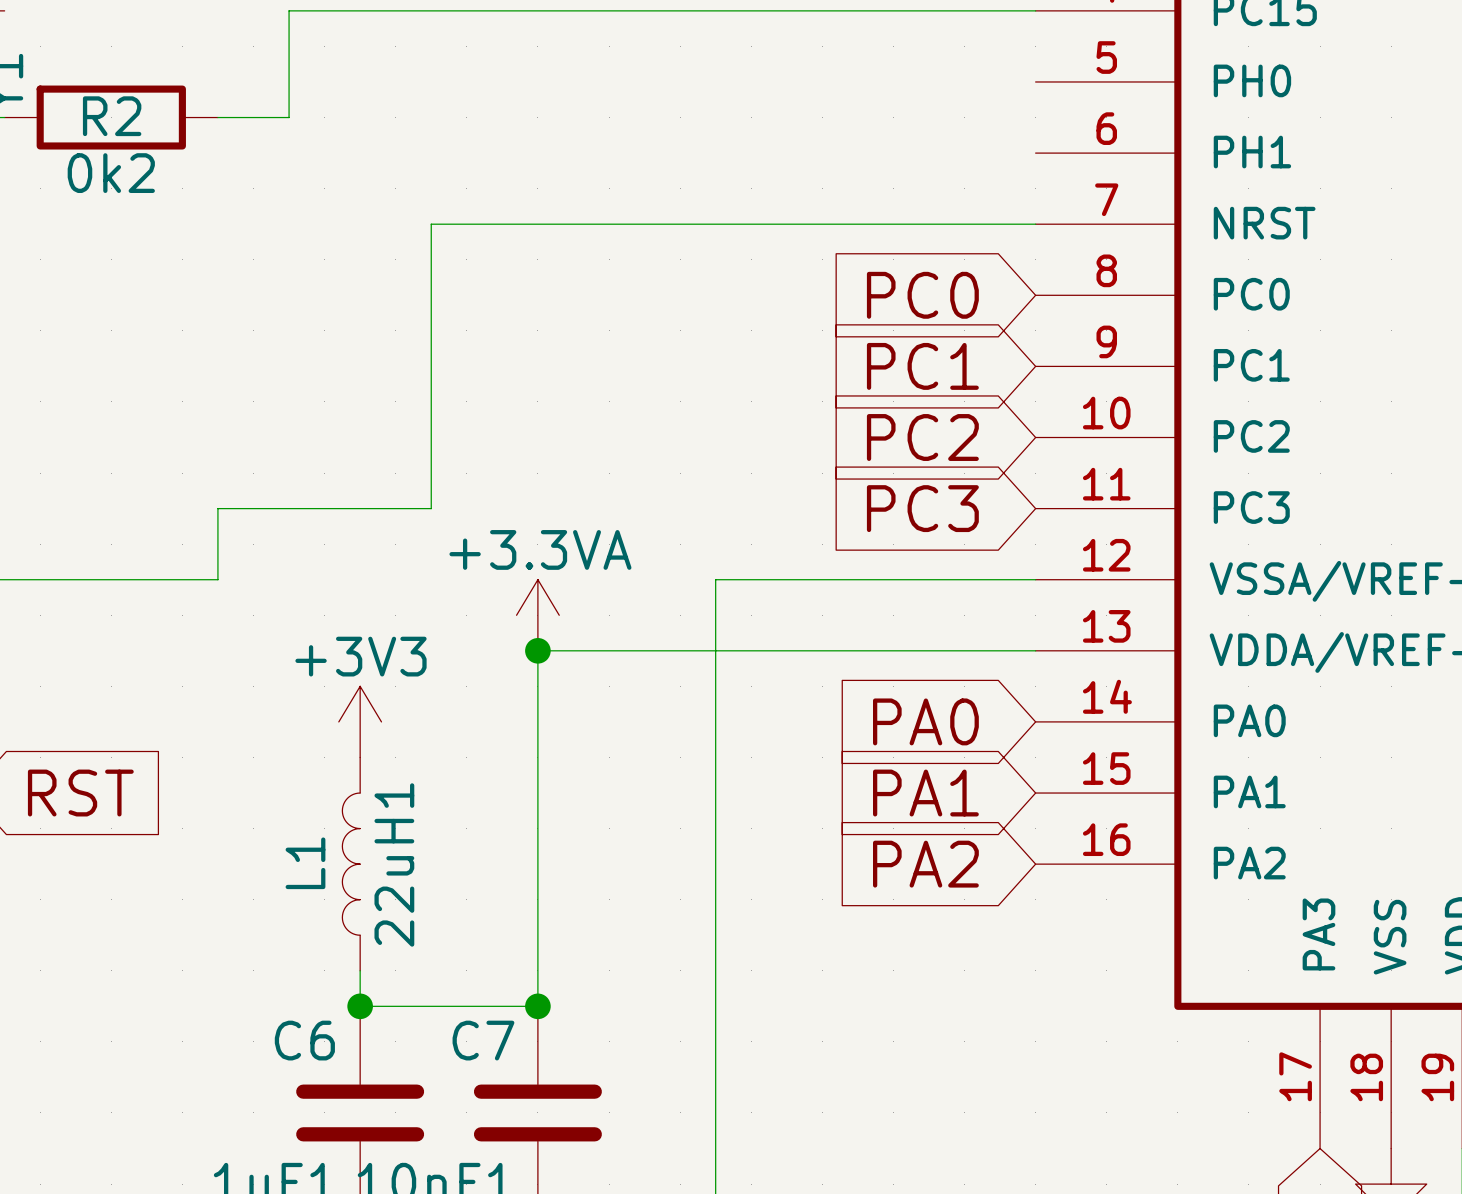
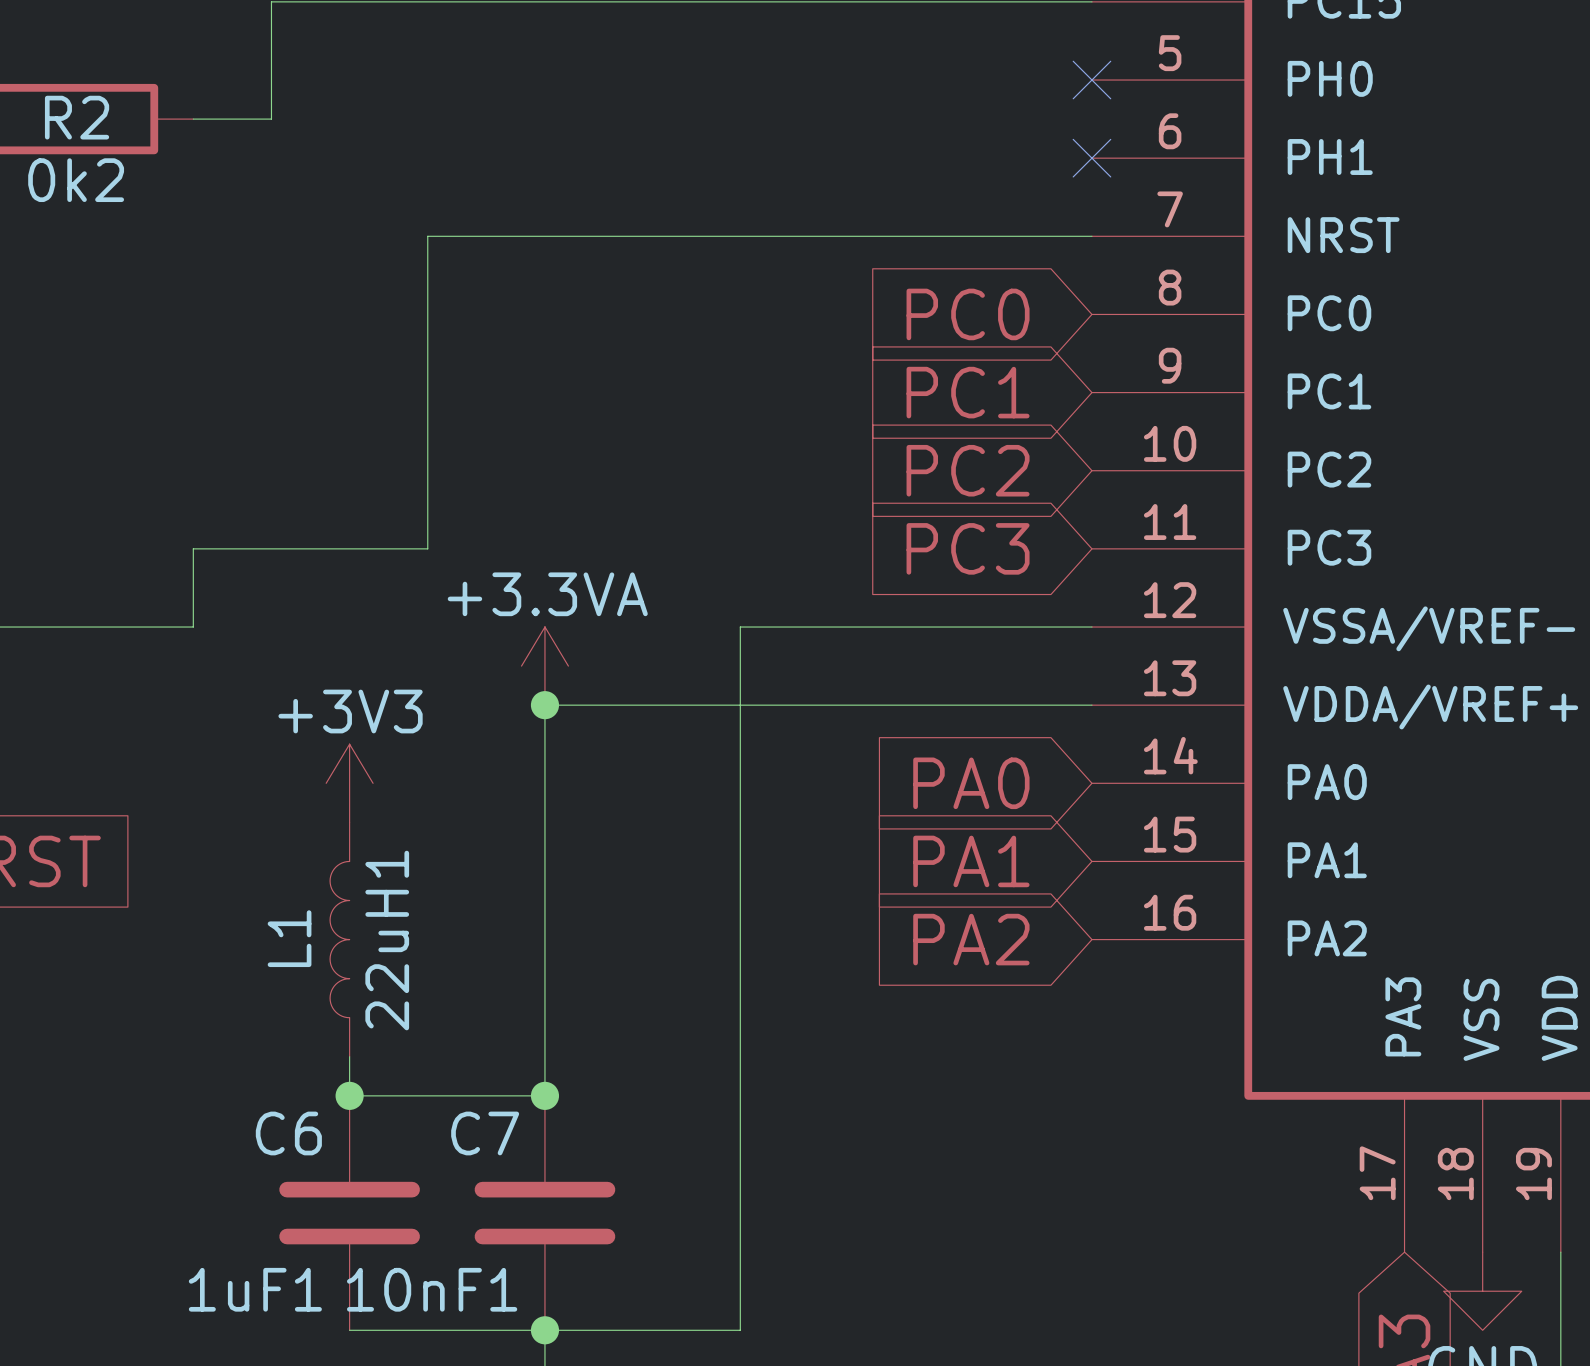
no-connect mark: none -> (1091, 80)
no-connect mark: none -> (1091, 158)

